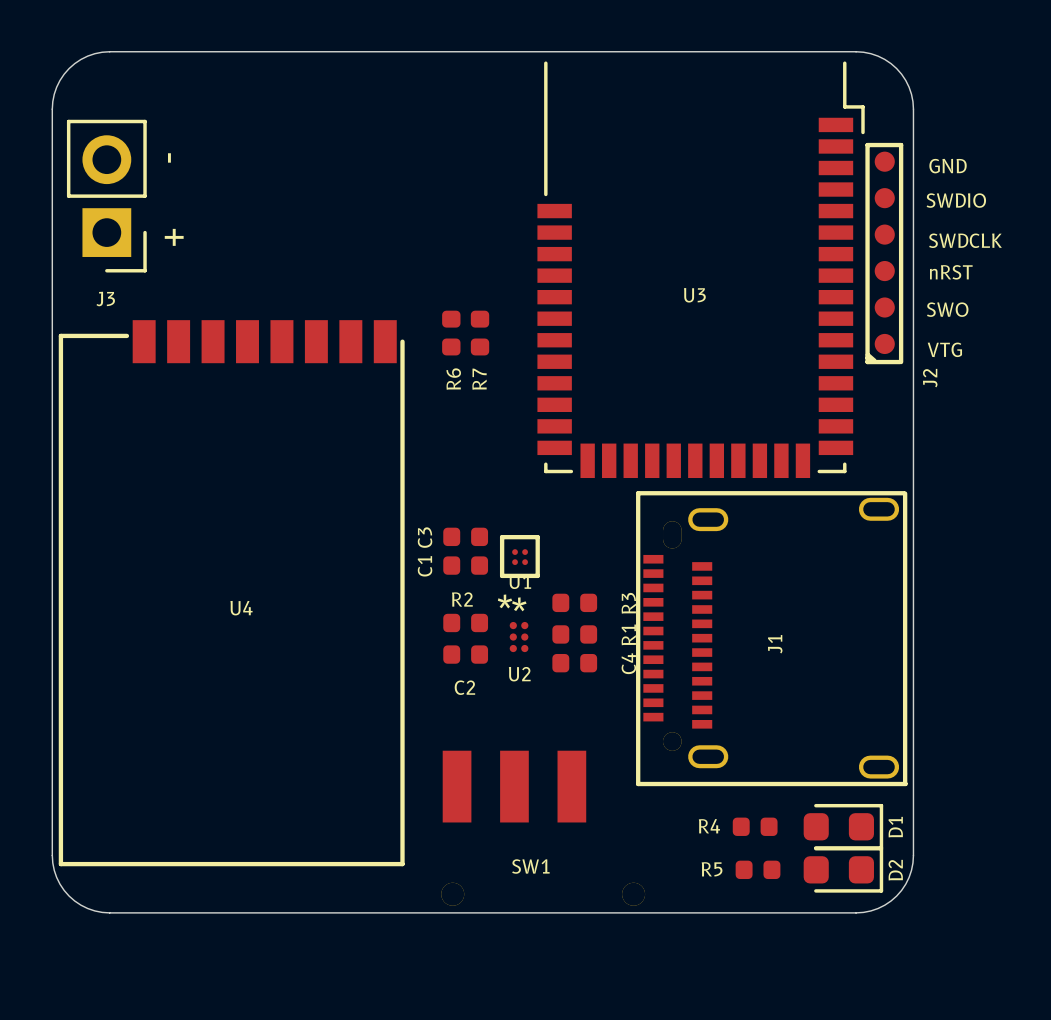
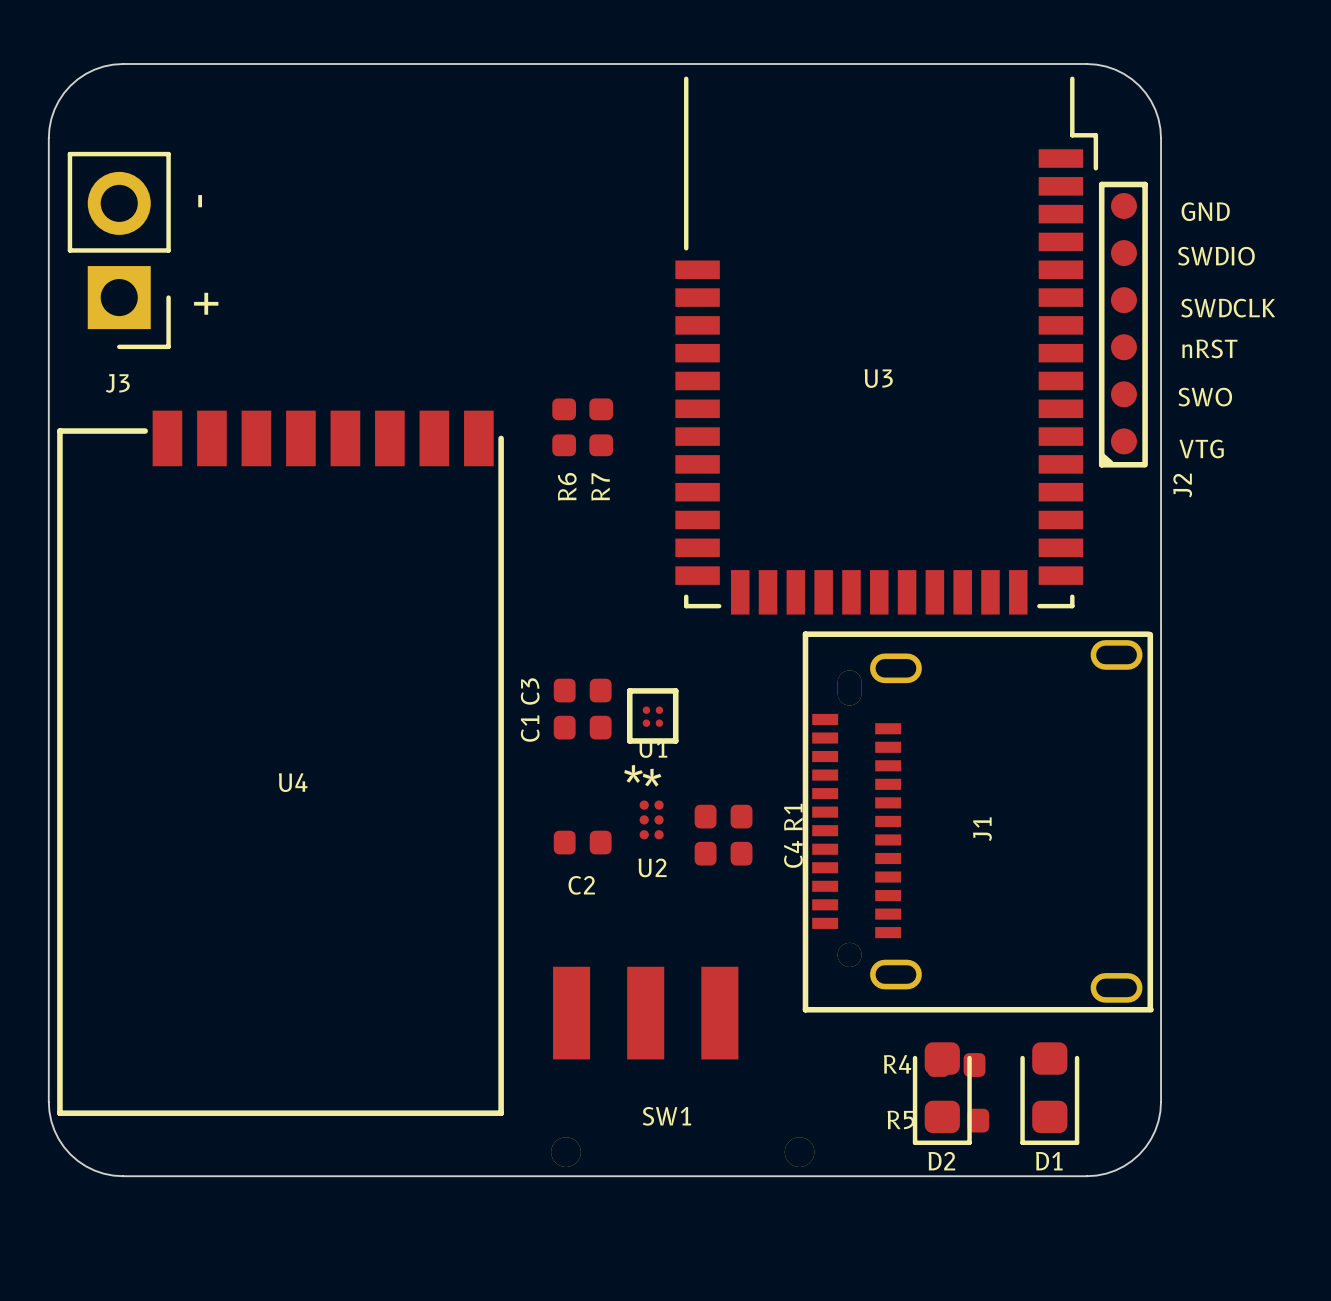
R3: (574, 602) -> none
R2: (465, 622) -> none
D1 rotation: 0° (843, 826) -> 90° clockwise (1049, 1093)
D2 rotation: 0° (843, 869) -> 90° clockwise (942, 1093)
D2 position: (843, 869) -> (942, 1093)

